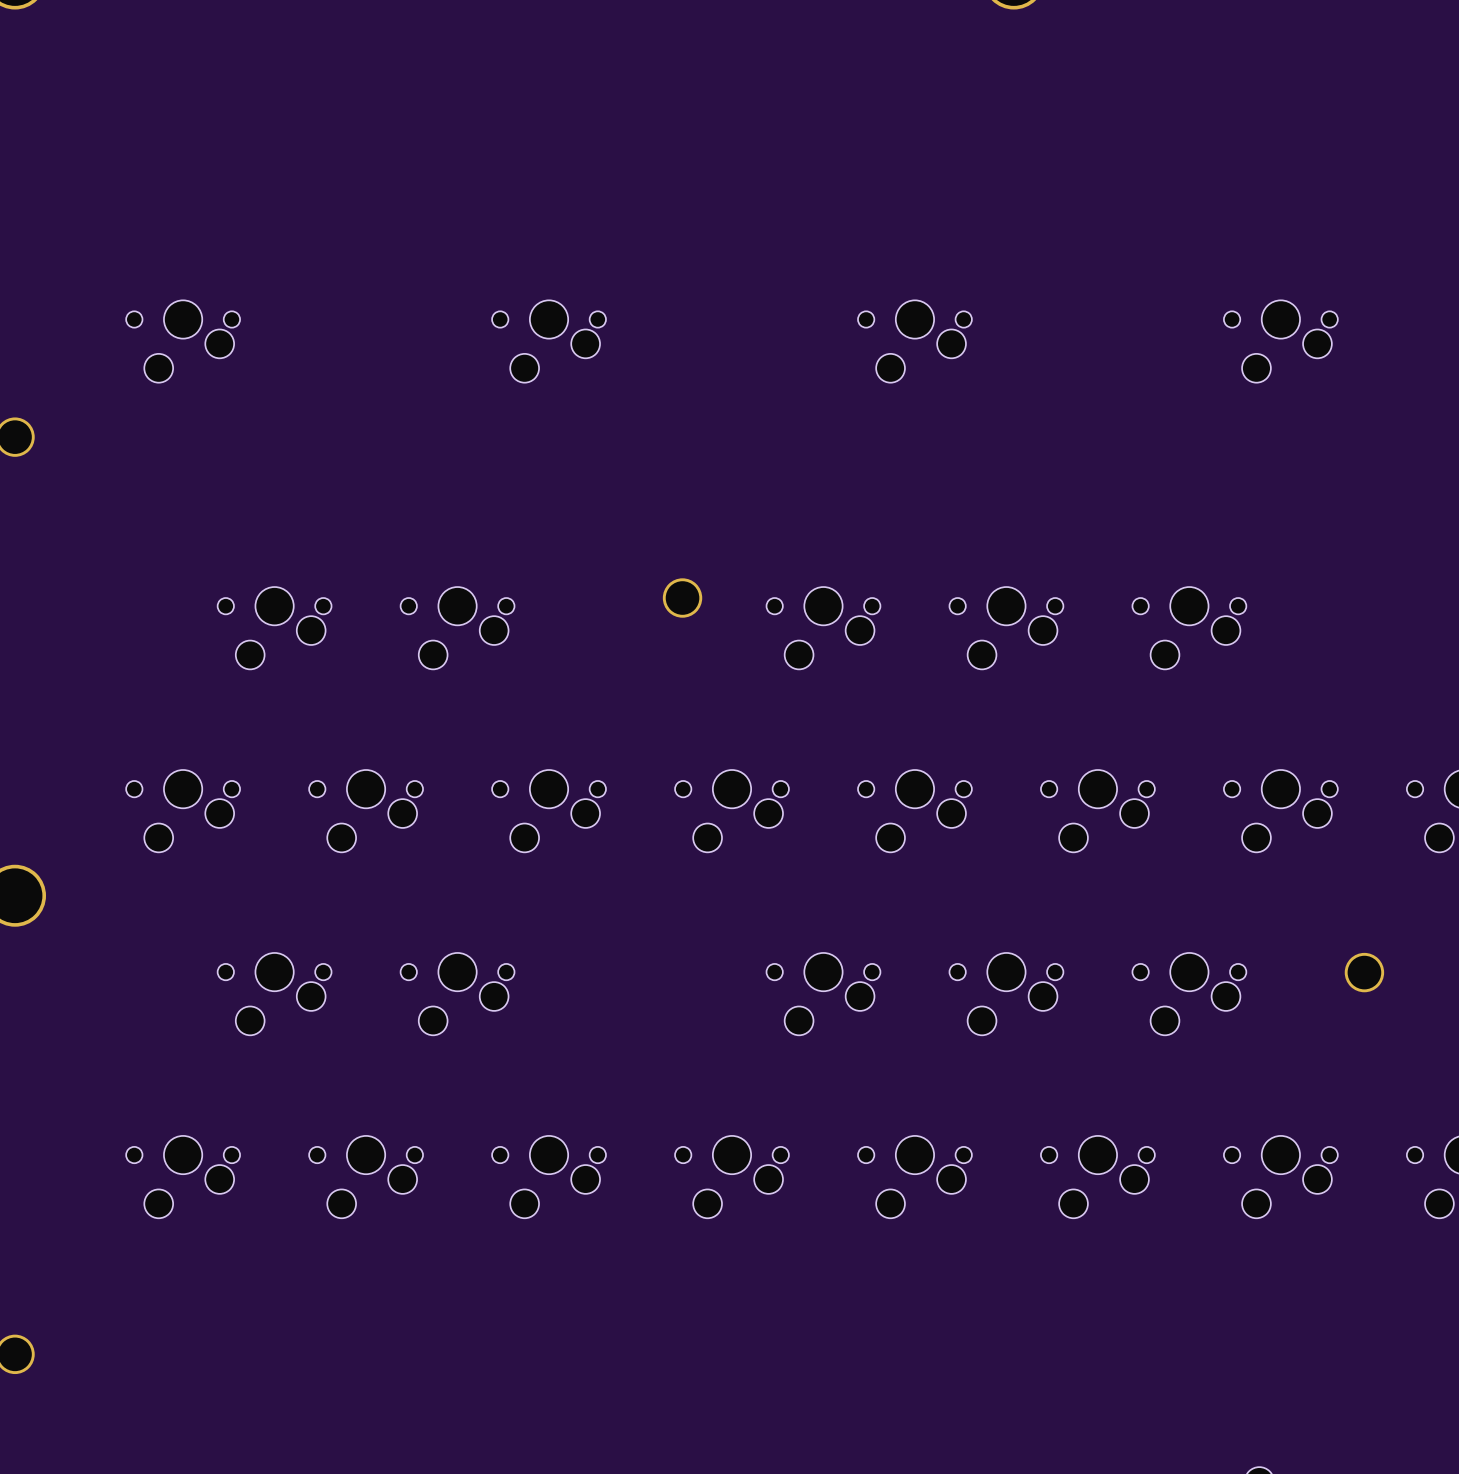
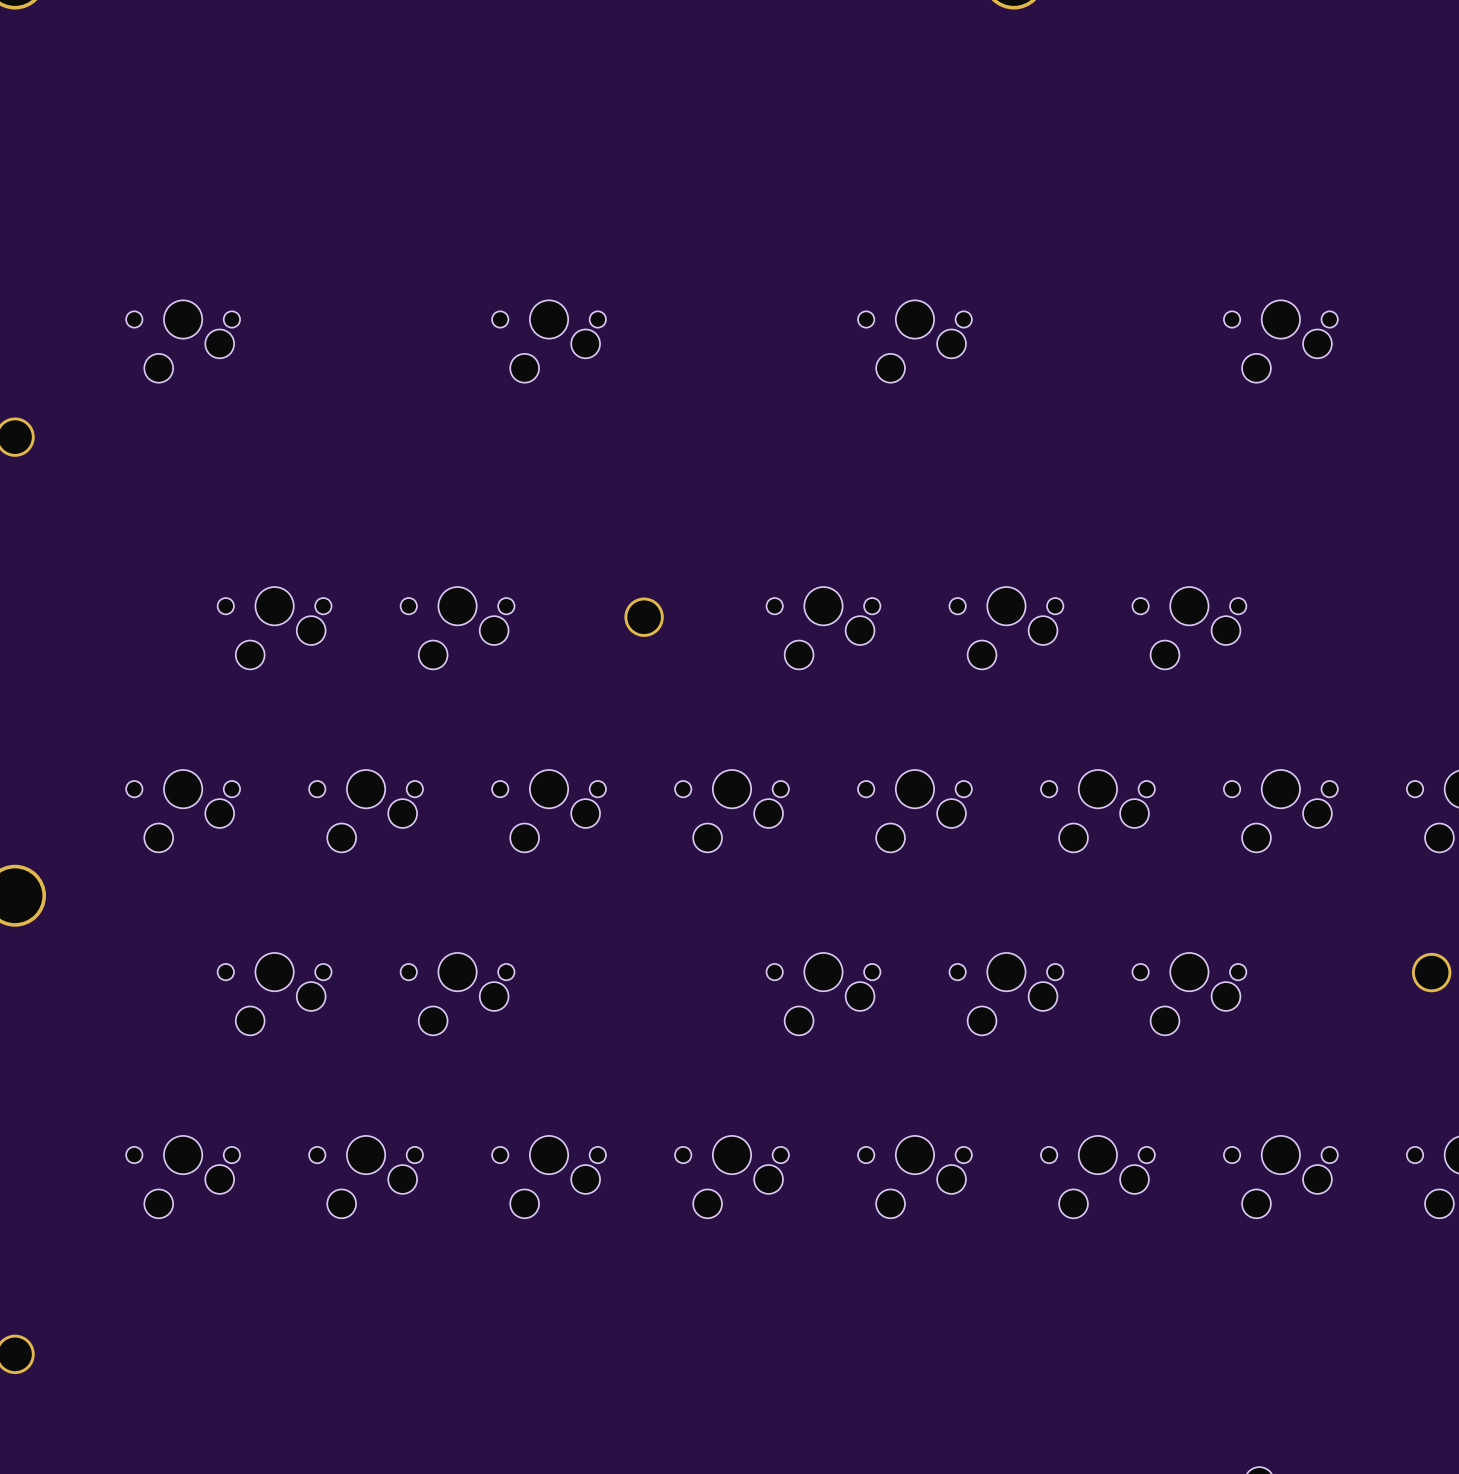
part position: (682, 598) -> (644, 617)
part position: (1364, 972) -> (1431, 972)

